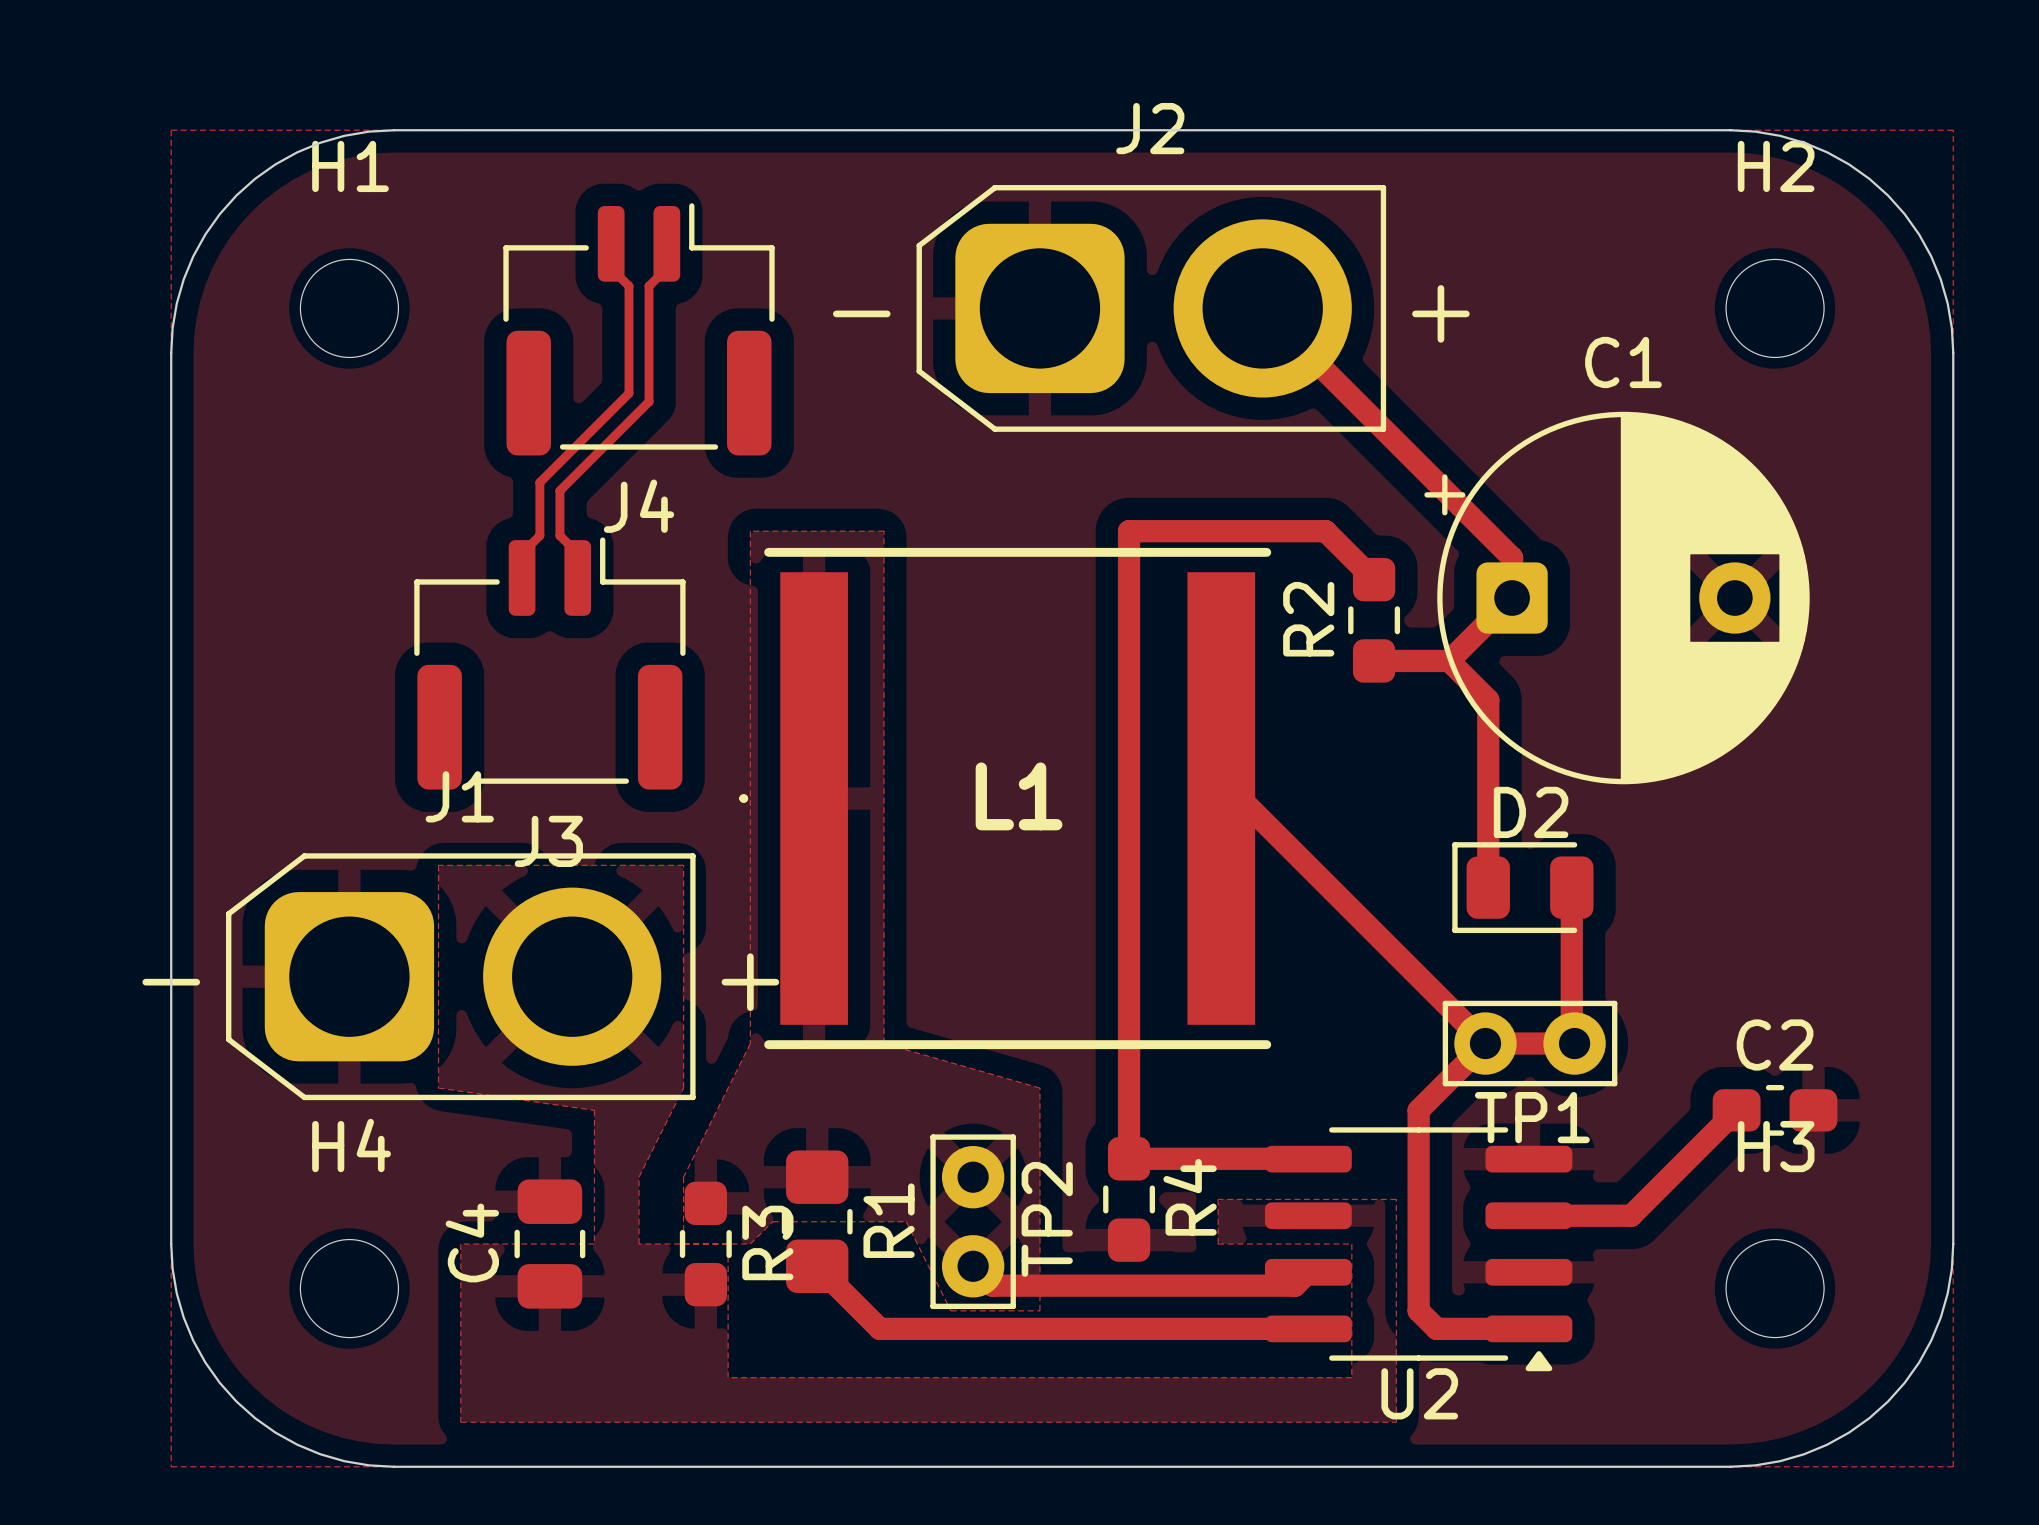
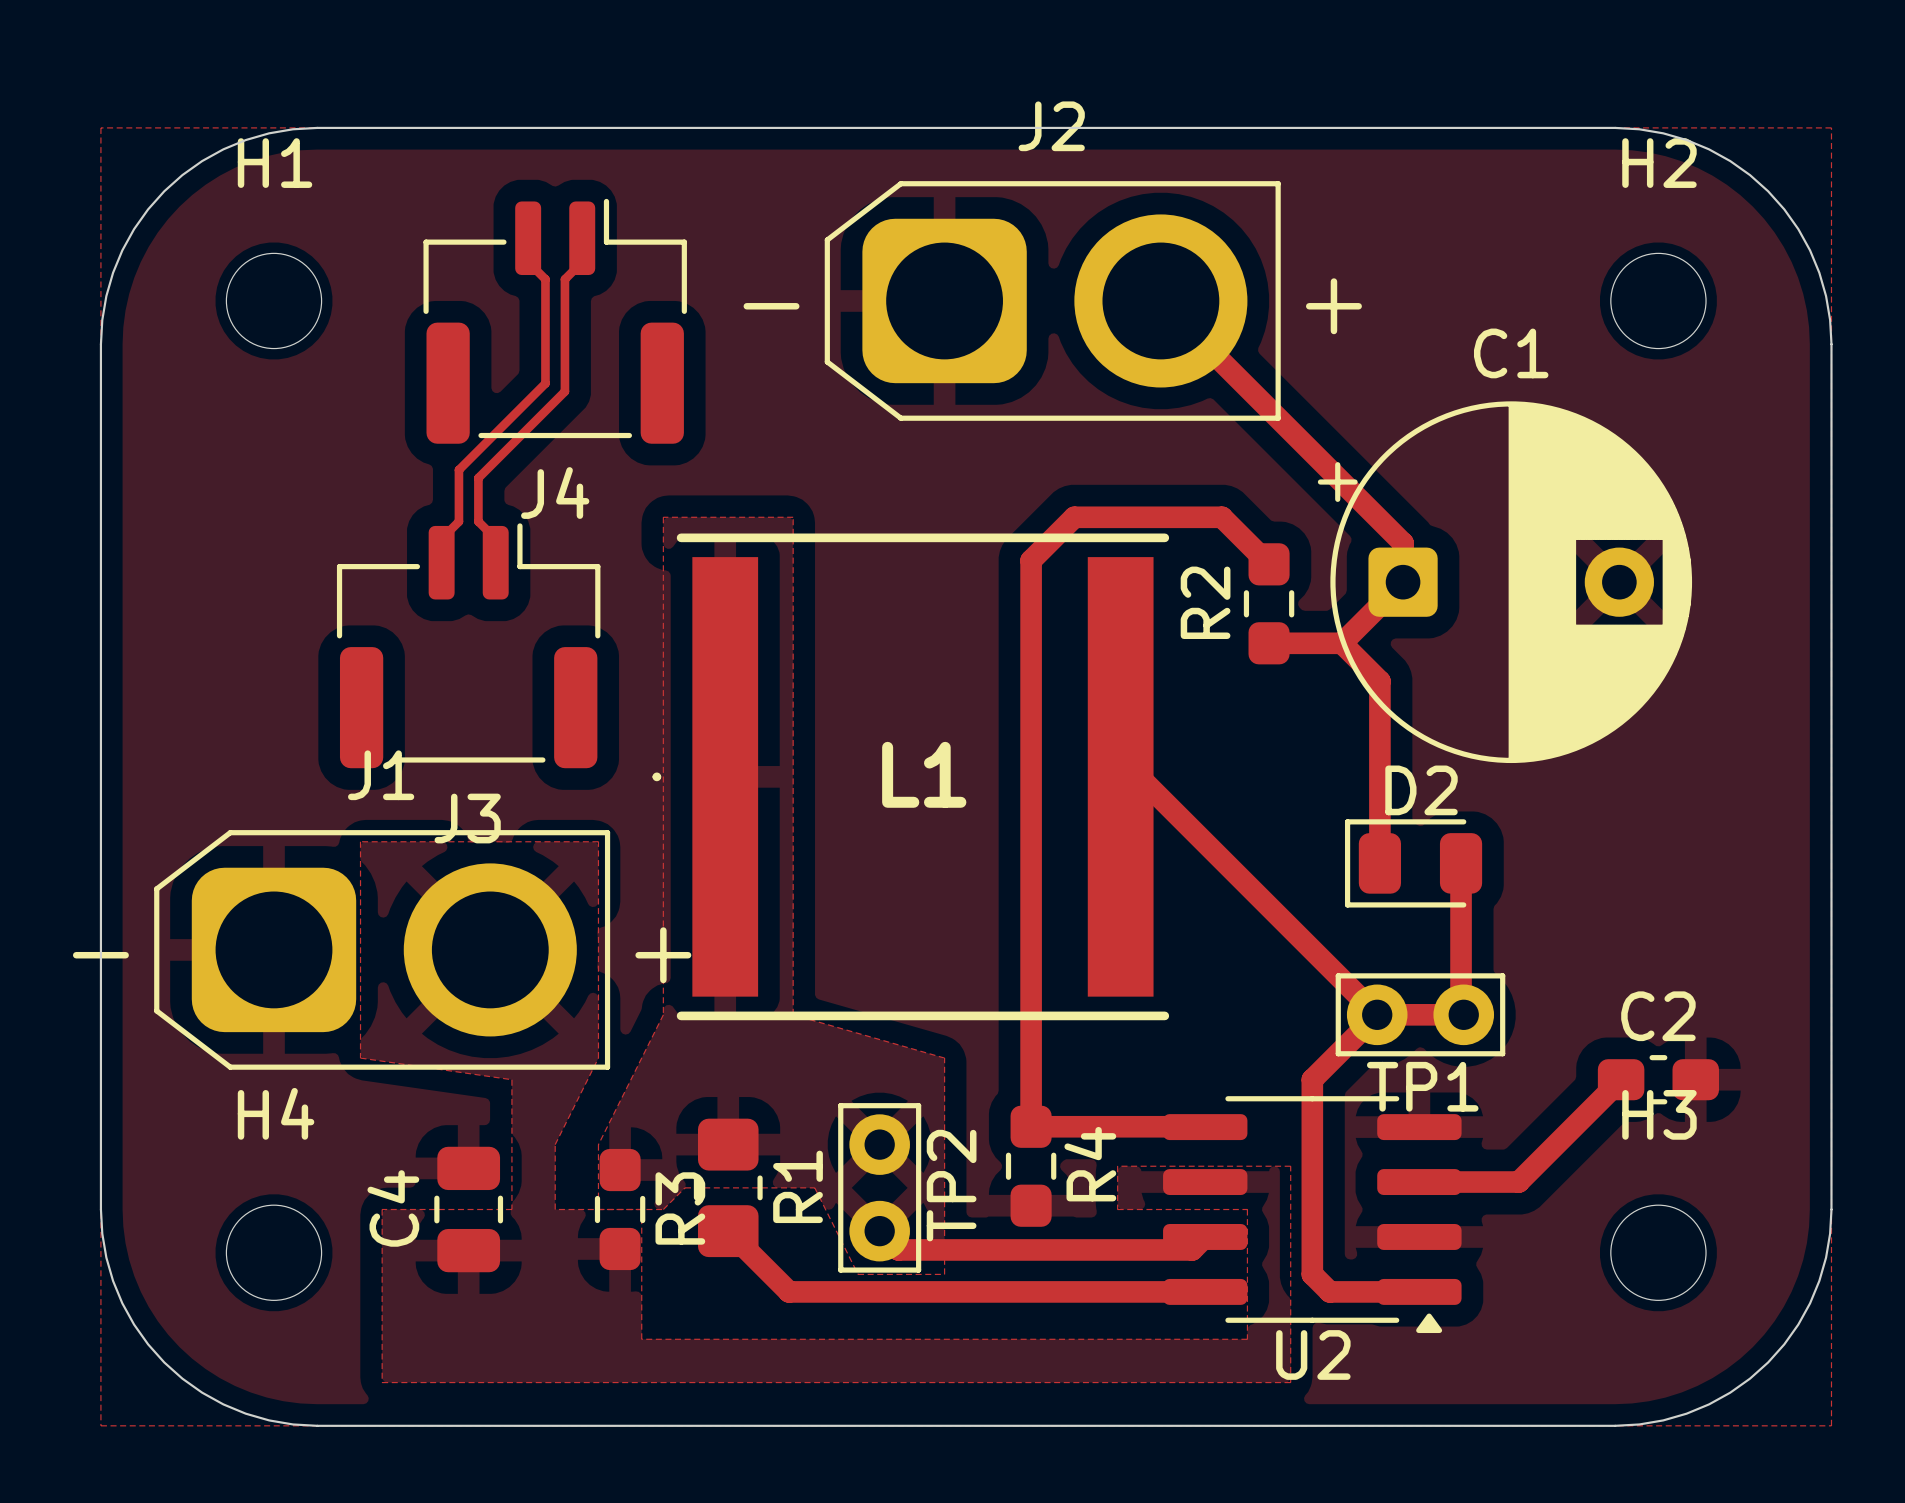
track: (1173, 531) (1129, 531) (1129, 575) -> (1074, 517) (1031, 560)

